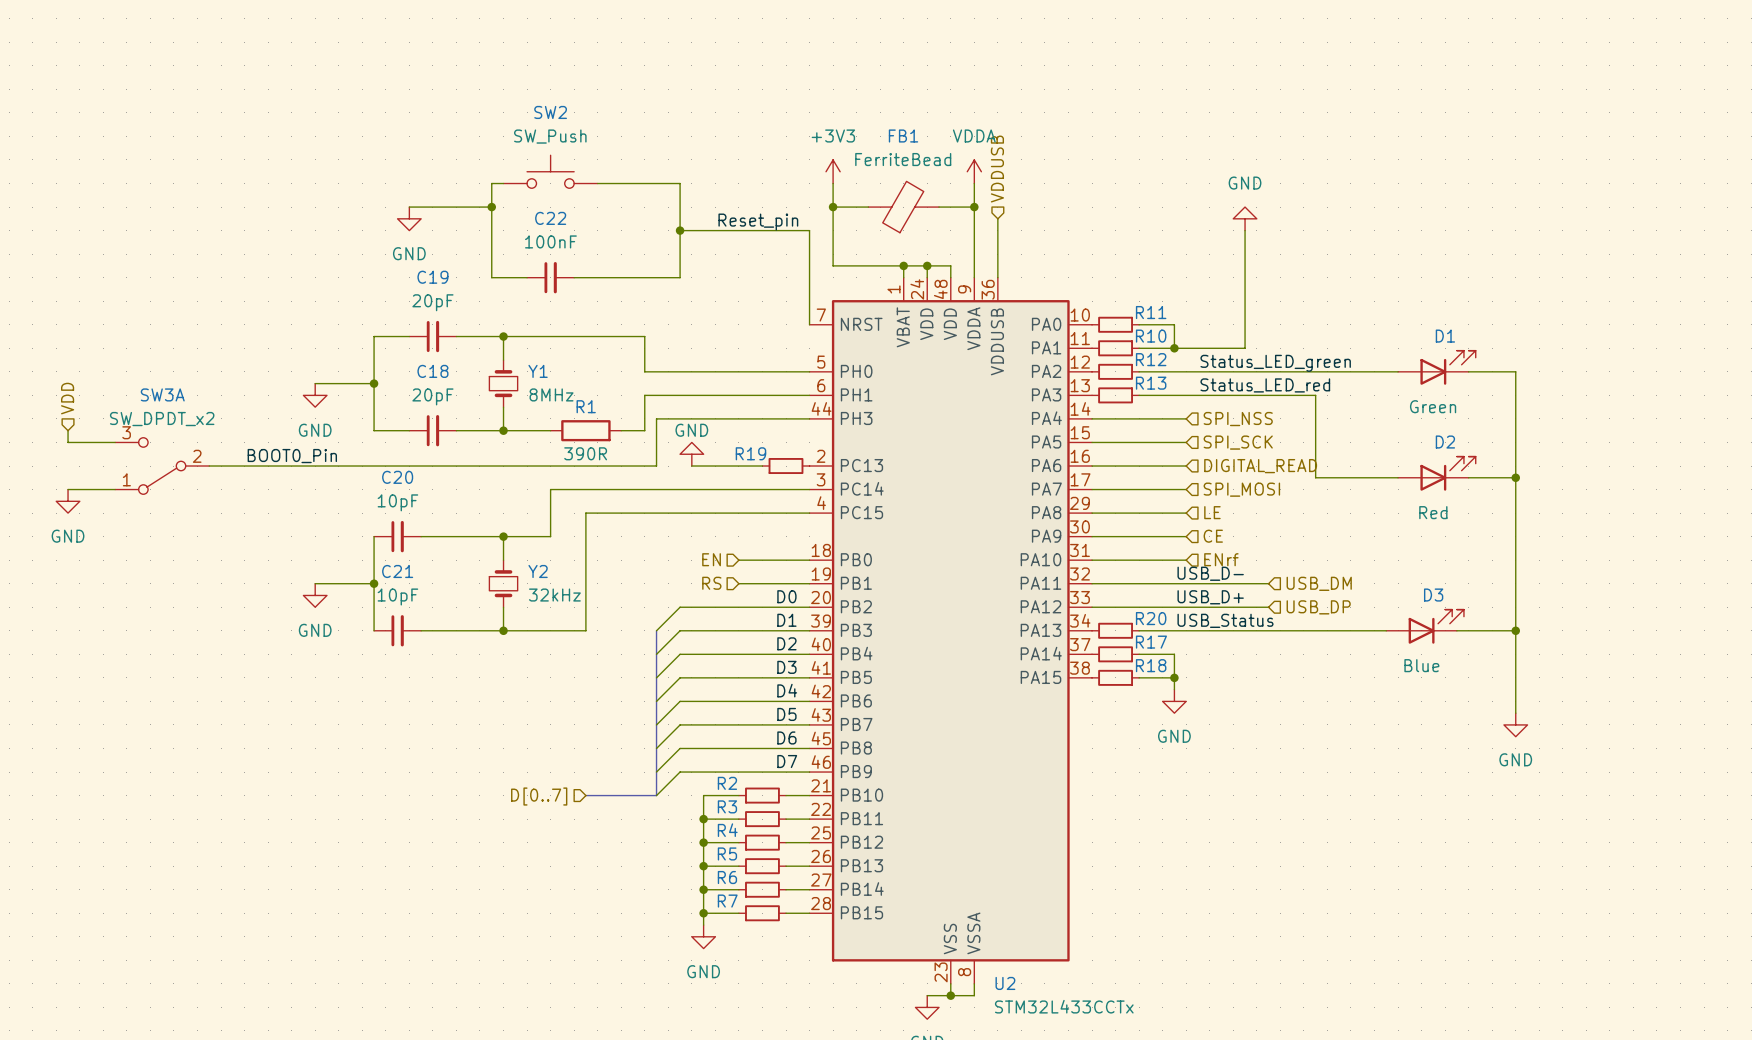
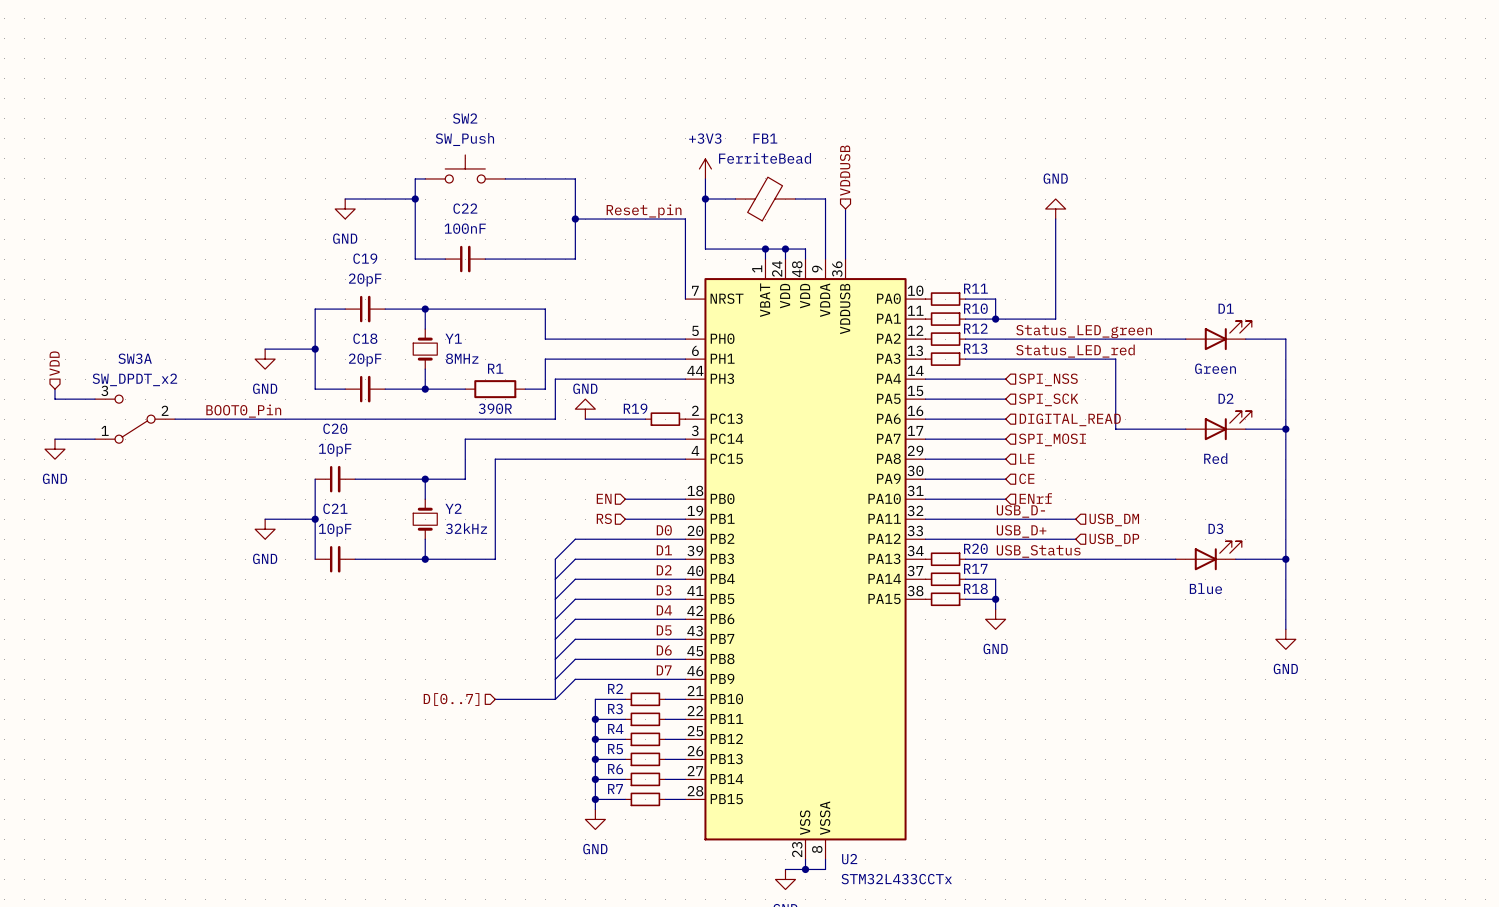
power symbol: VDDA (974, 171) -> none
wire: (974, 183) (974, 207) -> none
junction: (974, 207) -> none

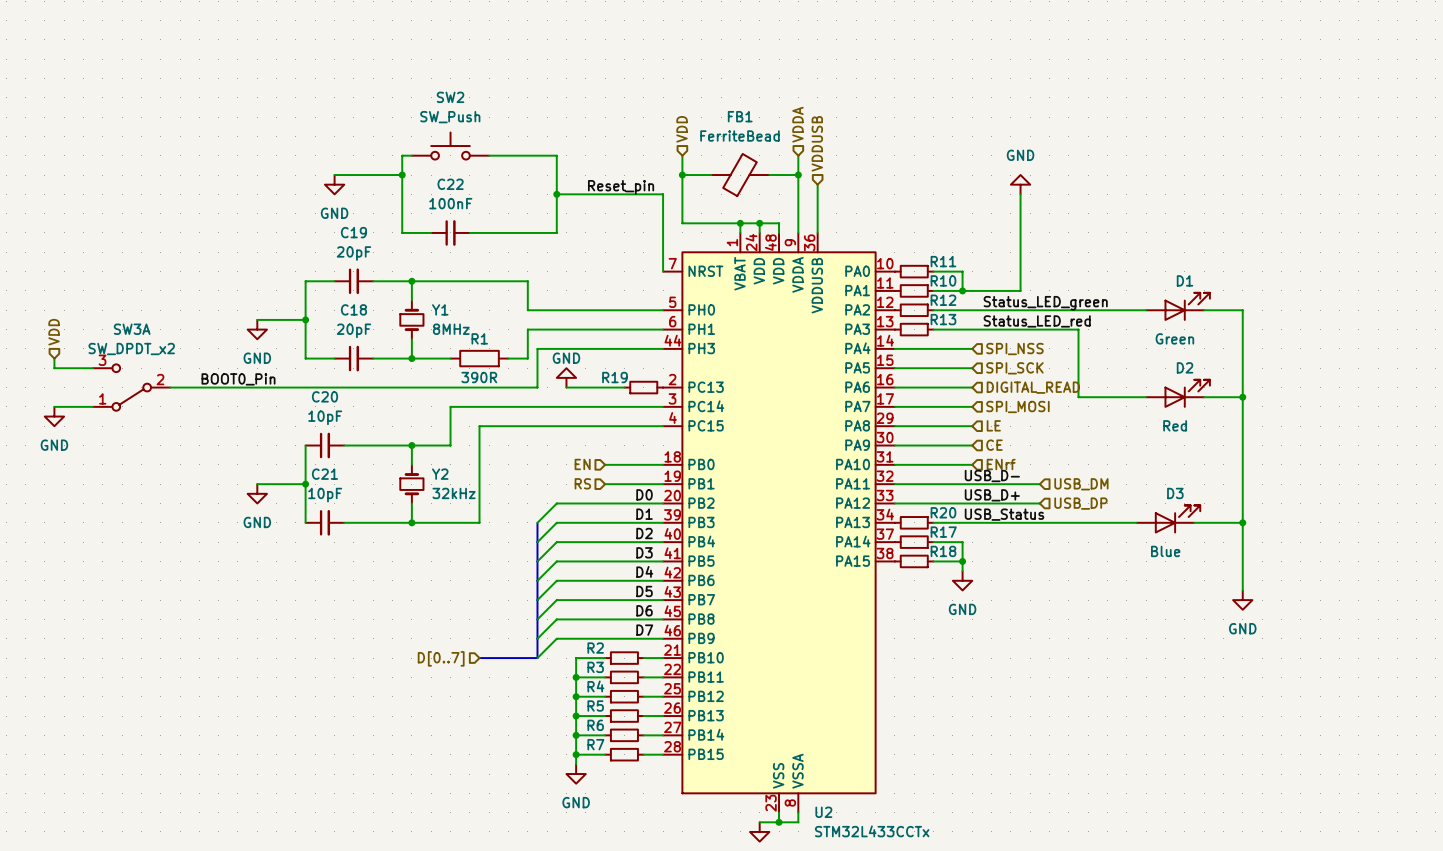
hierarchical label: none -> VDDA (797, 124)
hierarchical label: none -> VDD (682, 129)
power symbol: +3V3 (705, 168) -> none
wire: none -> (798, 155) (798, 175)
junction: none -> (798, 175)

